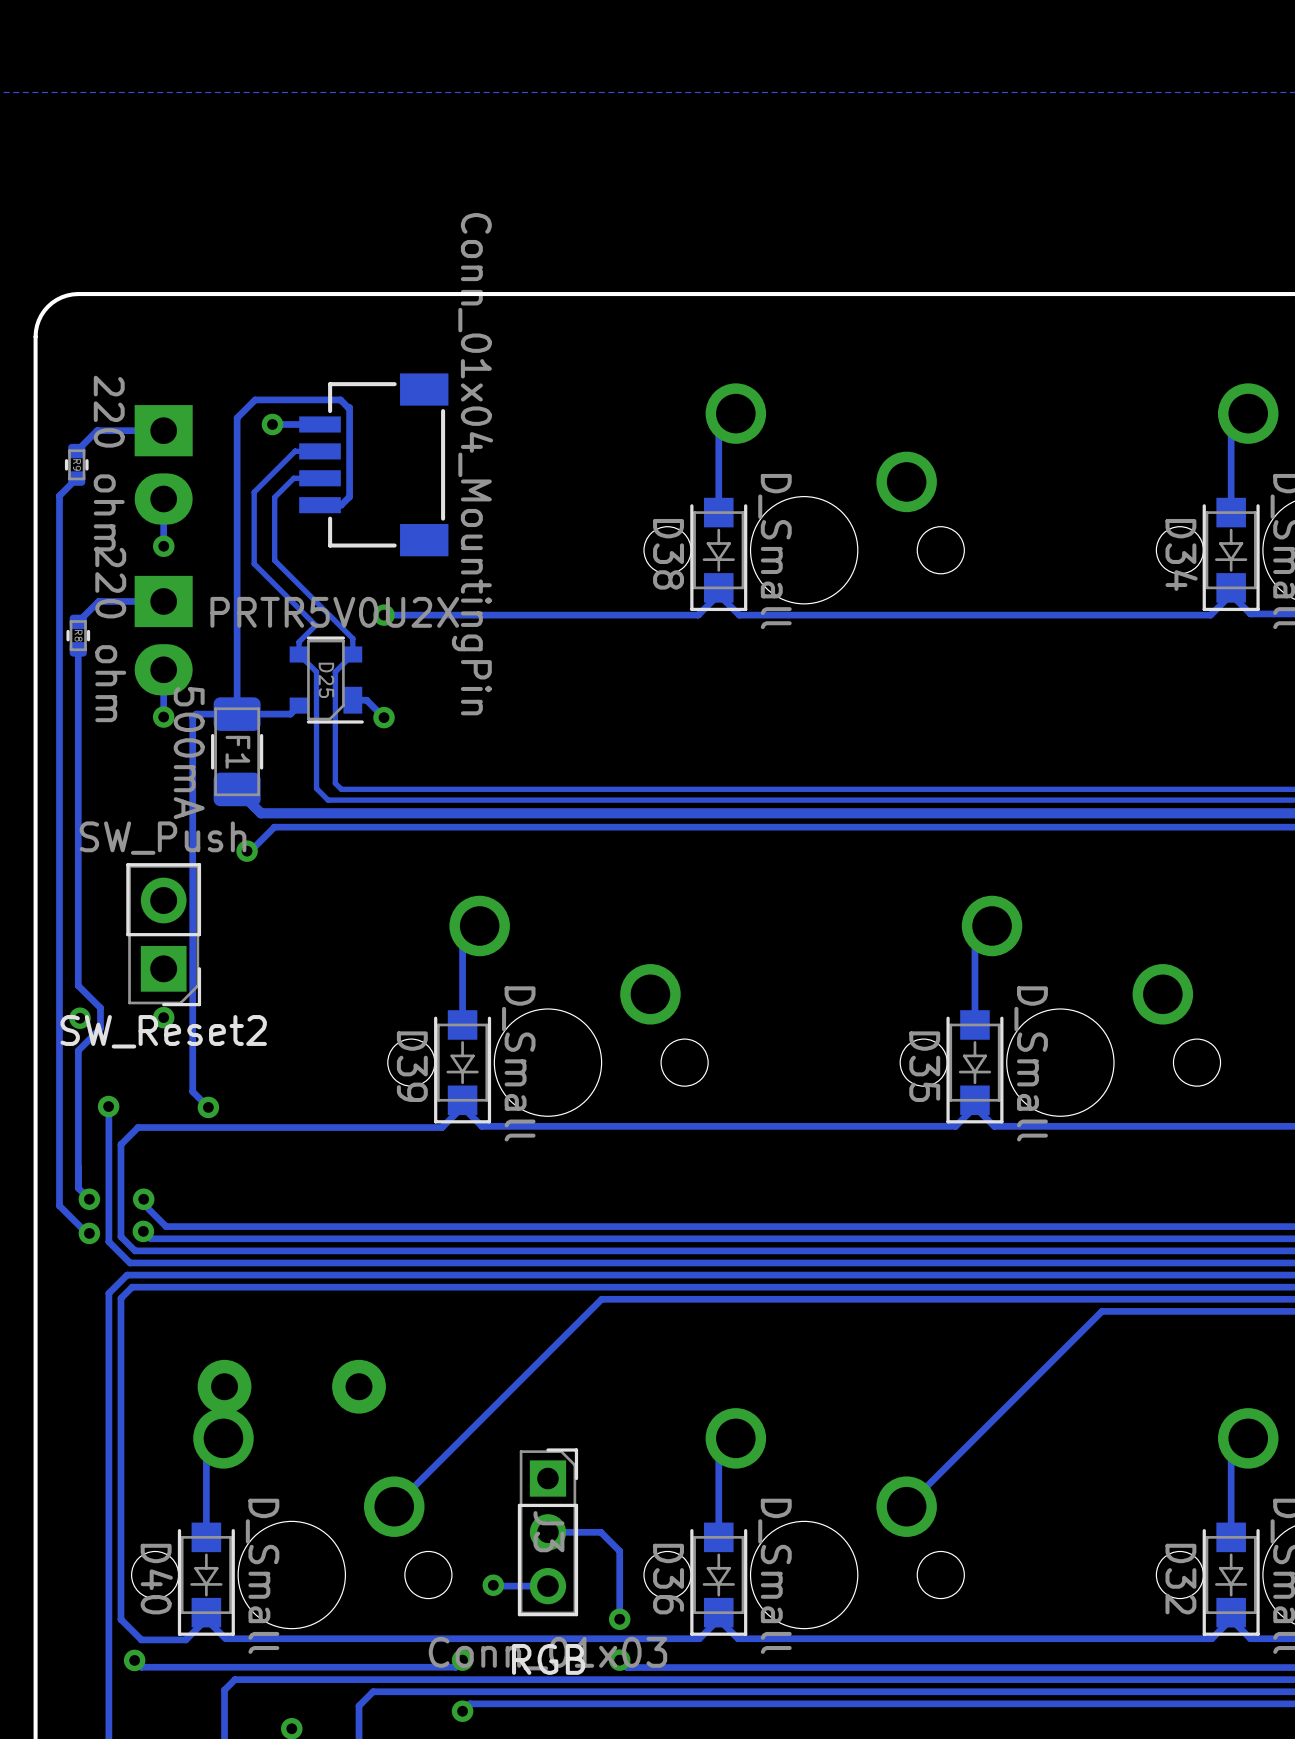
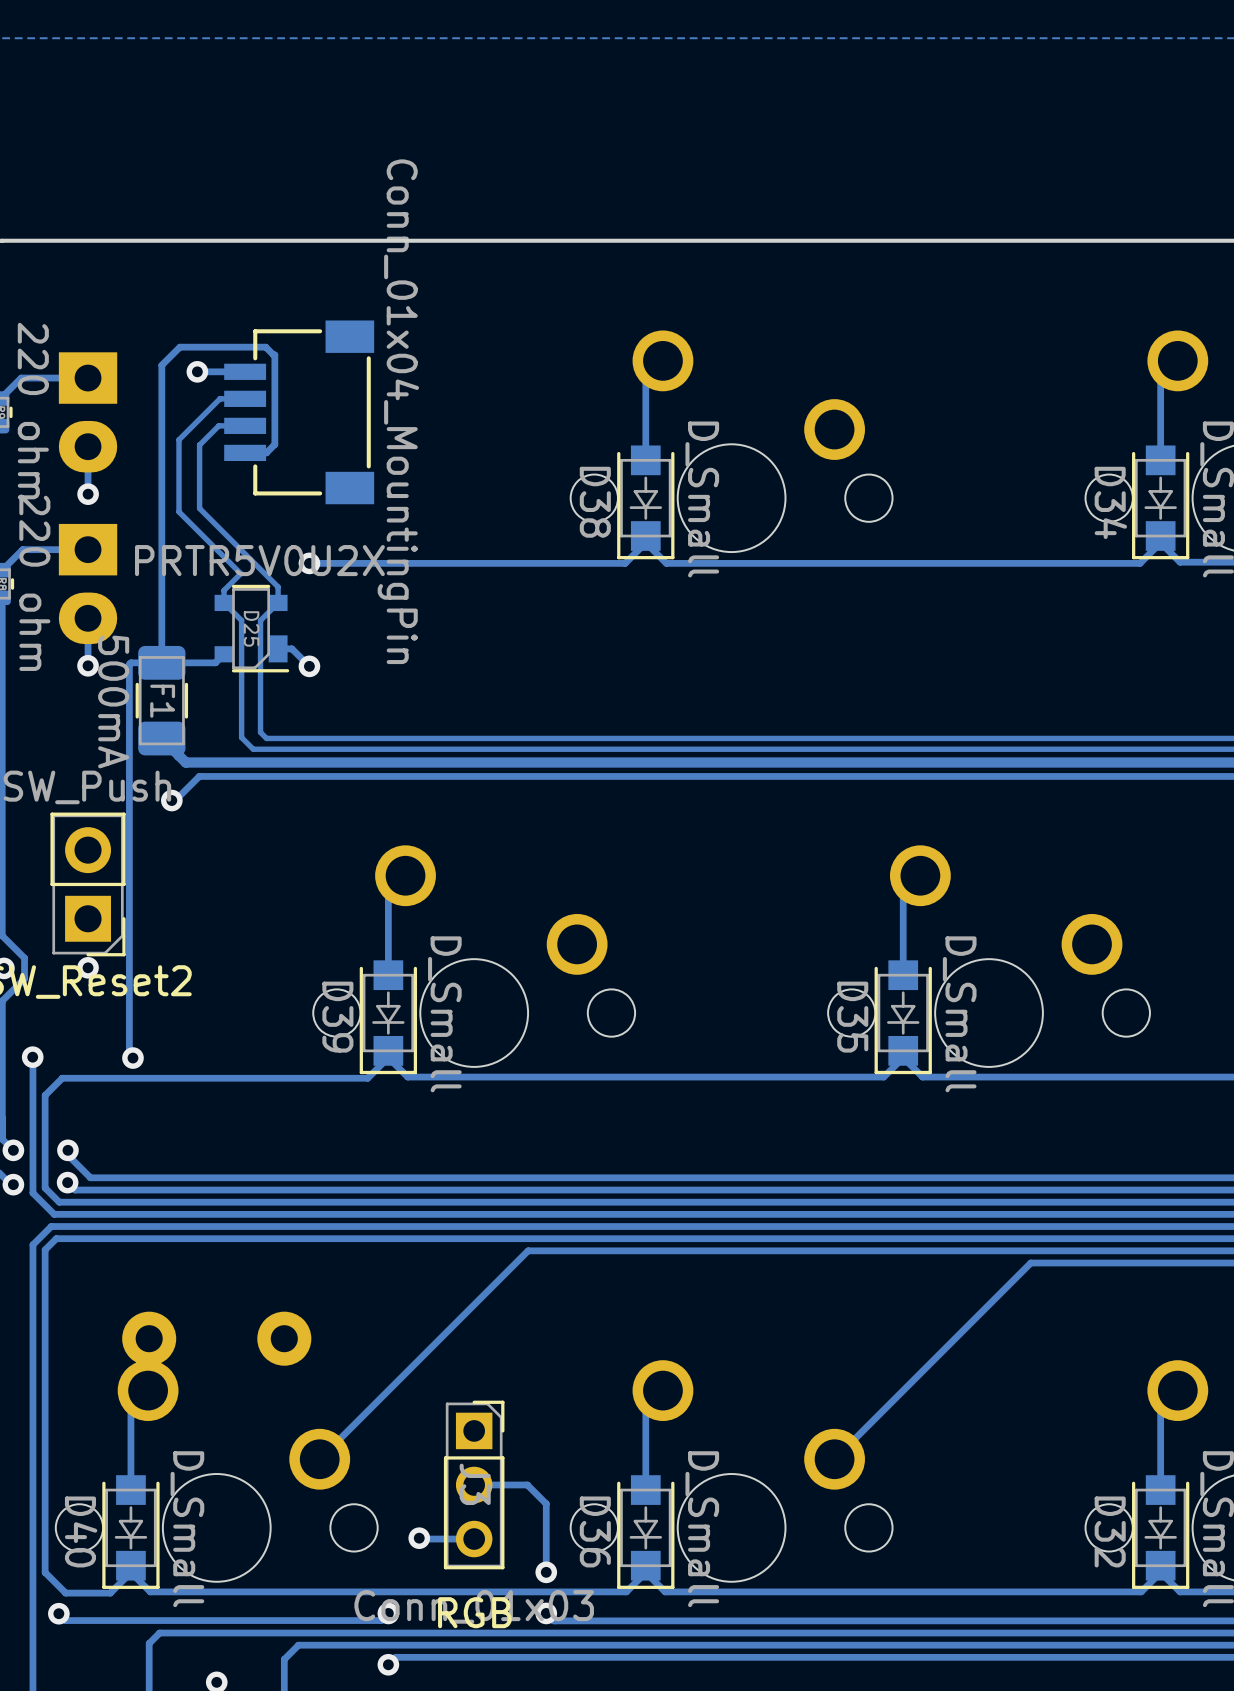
track: (206, 714) (196, 714) (192, 717) (192, 1091) (204, 1103) -> (130, 662) (129, 664) (129, 1054)

